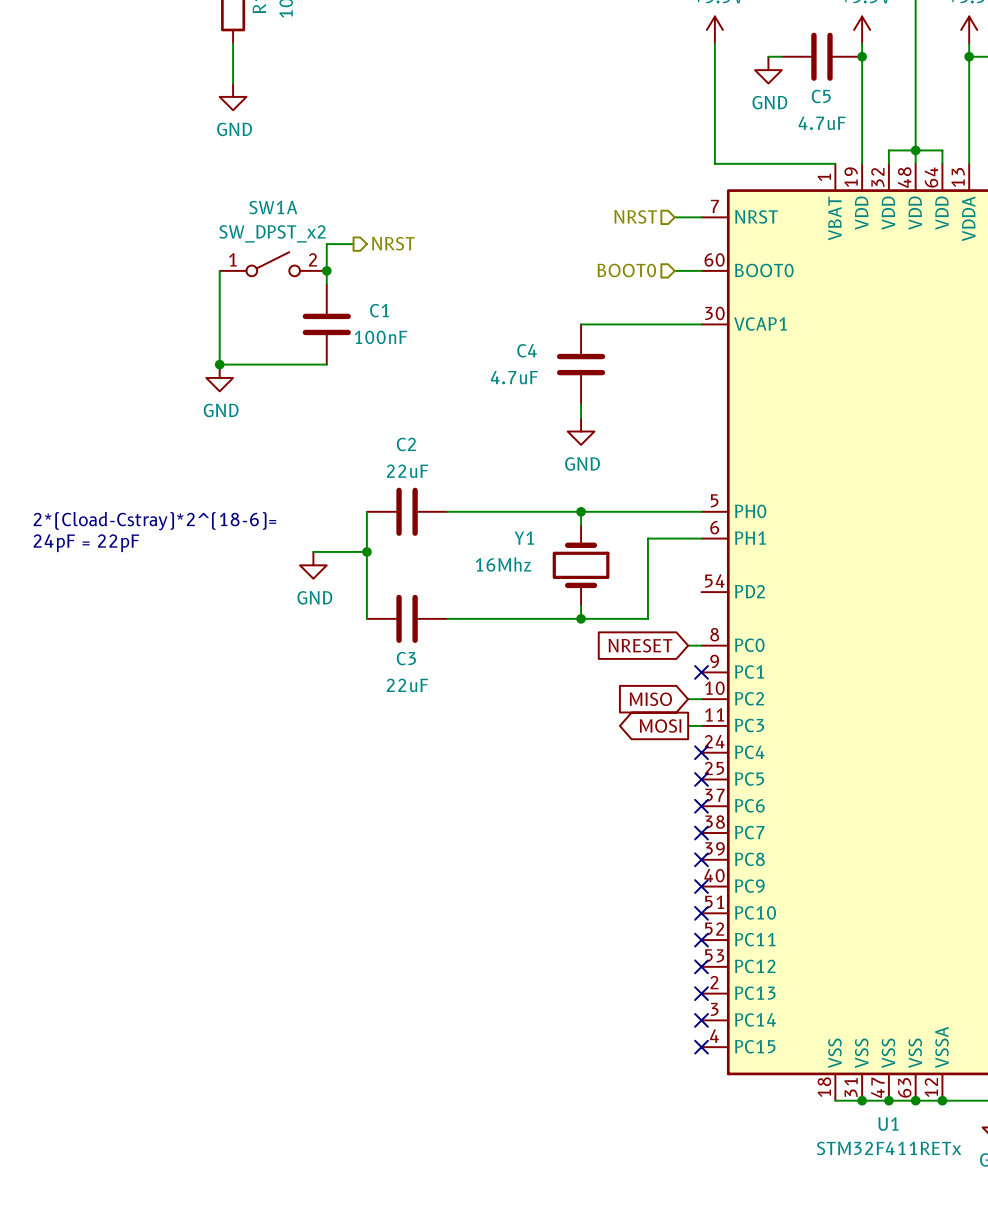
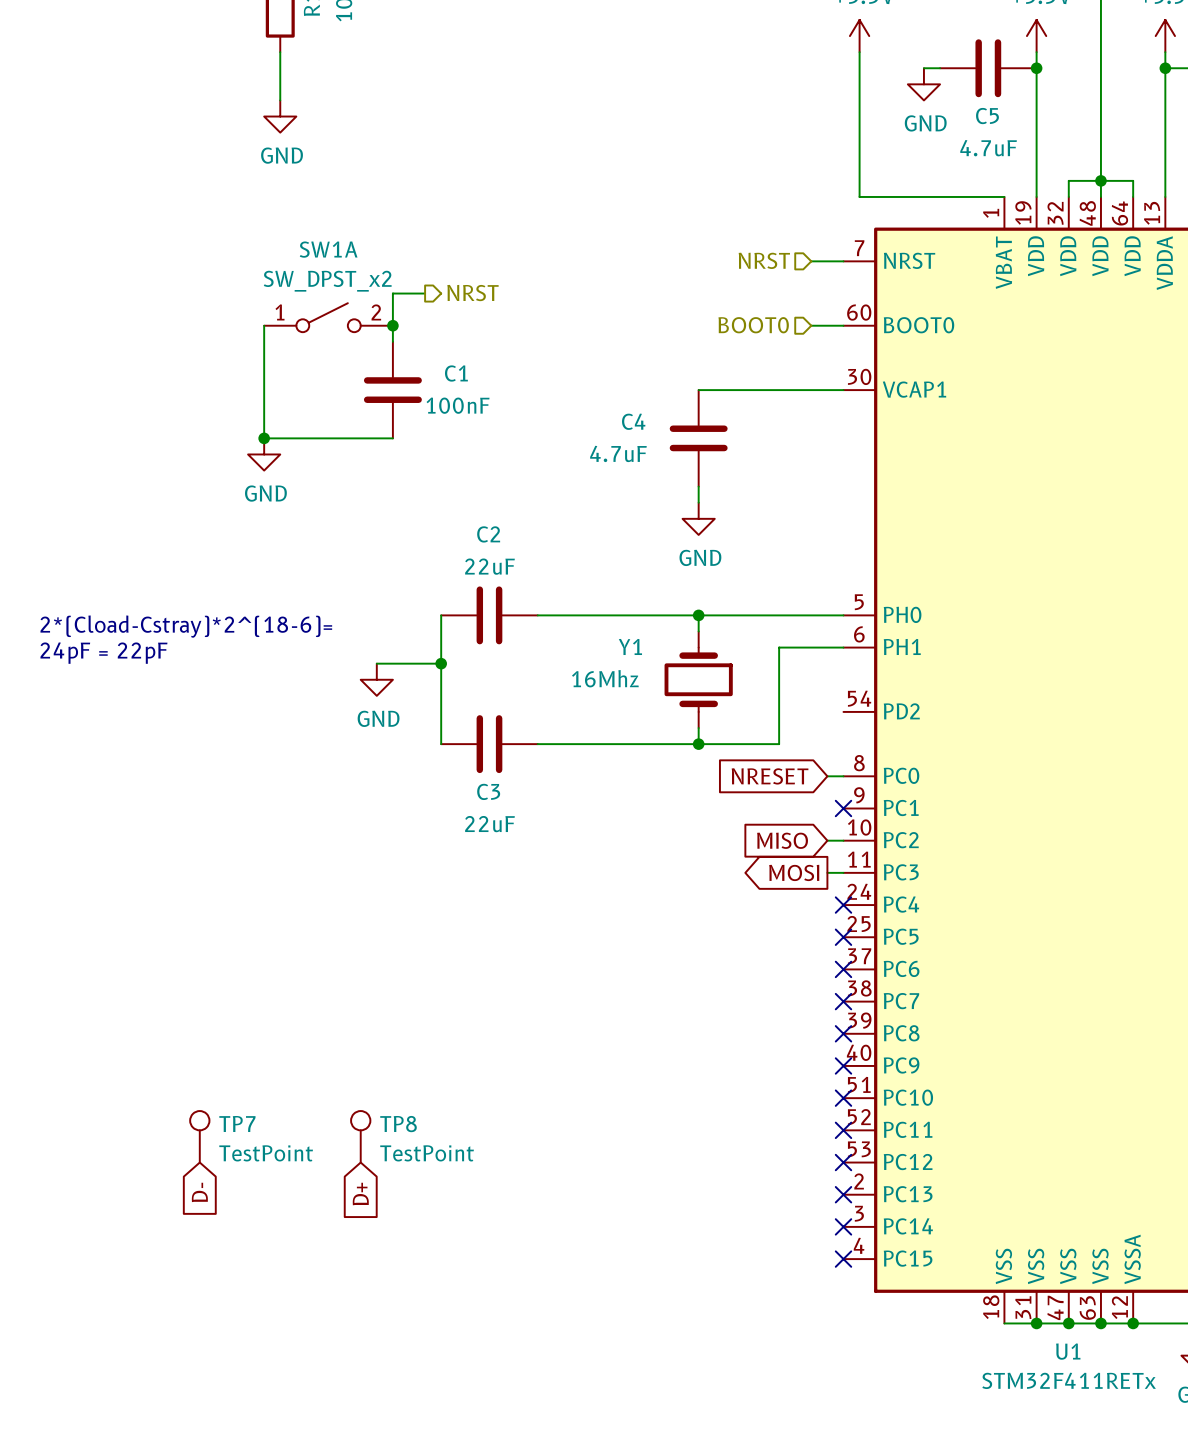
TP7: none -> TestPoint (199, 1136)
TP8: none -> TestPoint (360, 1136)
global label: none -> D- (199, 1192)
global label: none -> D+ (360, 1194)

